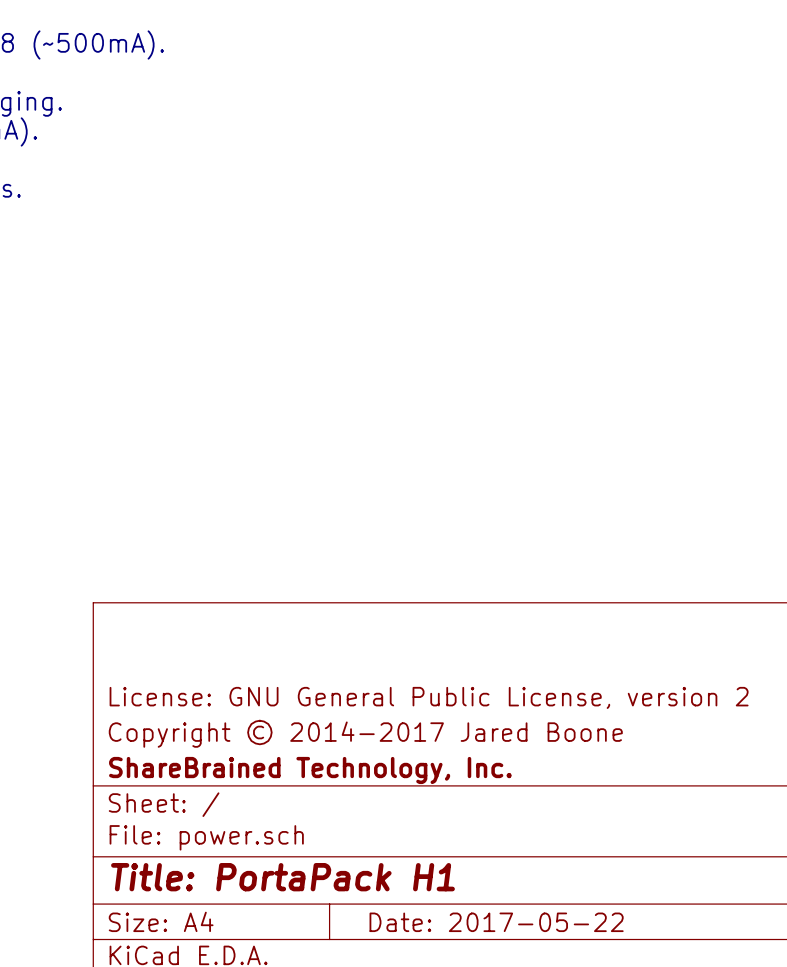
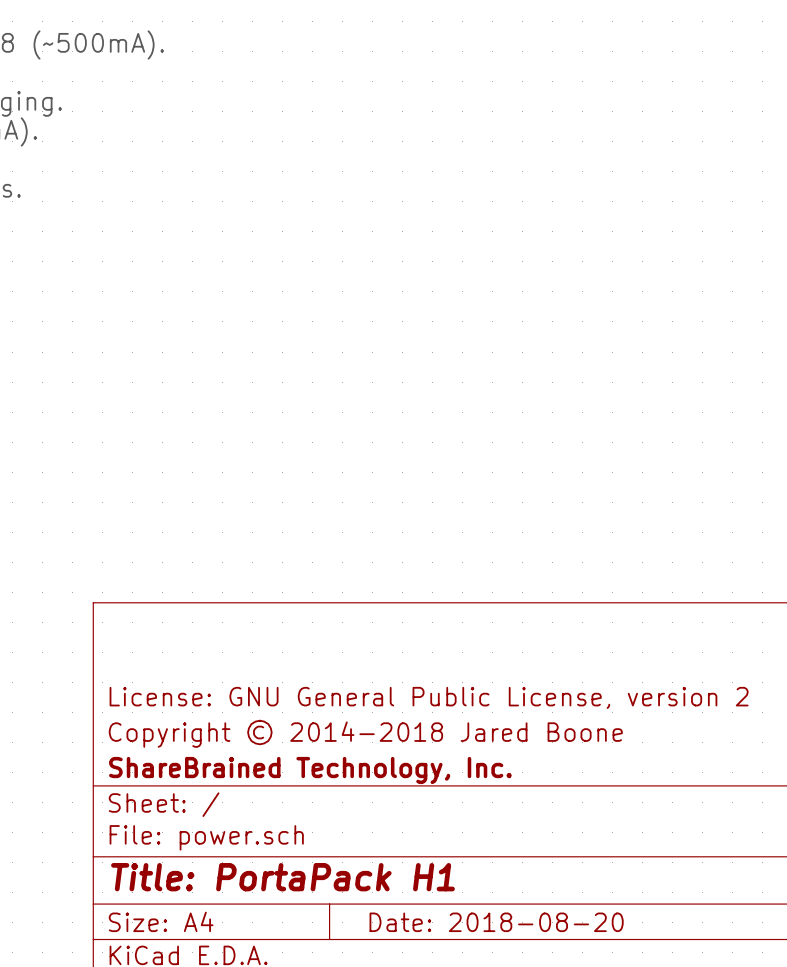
title block: Copyright © 2014-2017 Jared Boone (365, 733) -> Copyright © 2014-2018 Jared Boone (365, 733)
title block: Date: 2017-05-22 (496, 922) -> Date: 2018-08-20 (496, 922)

